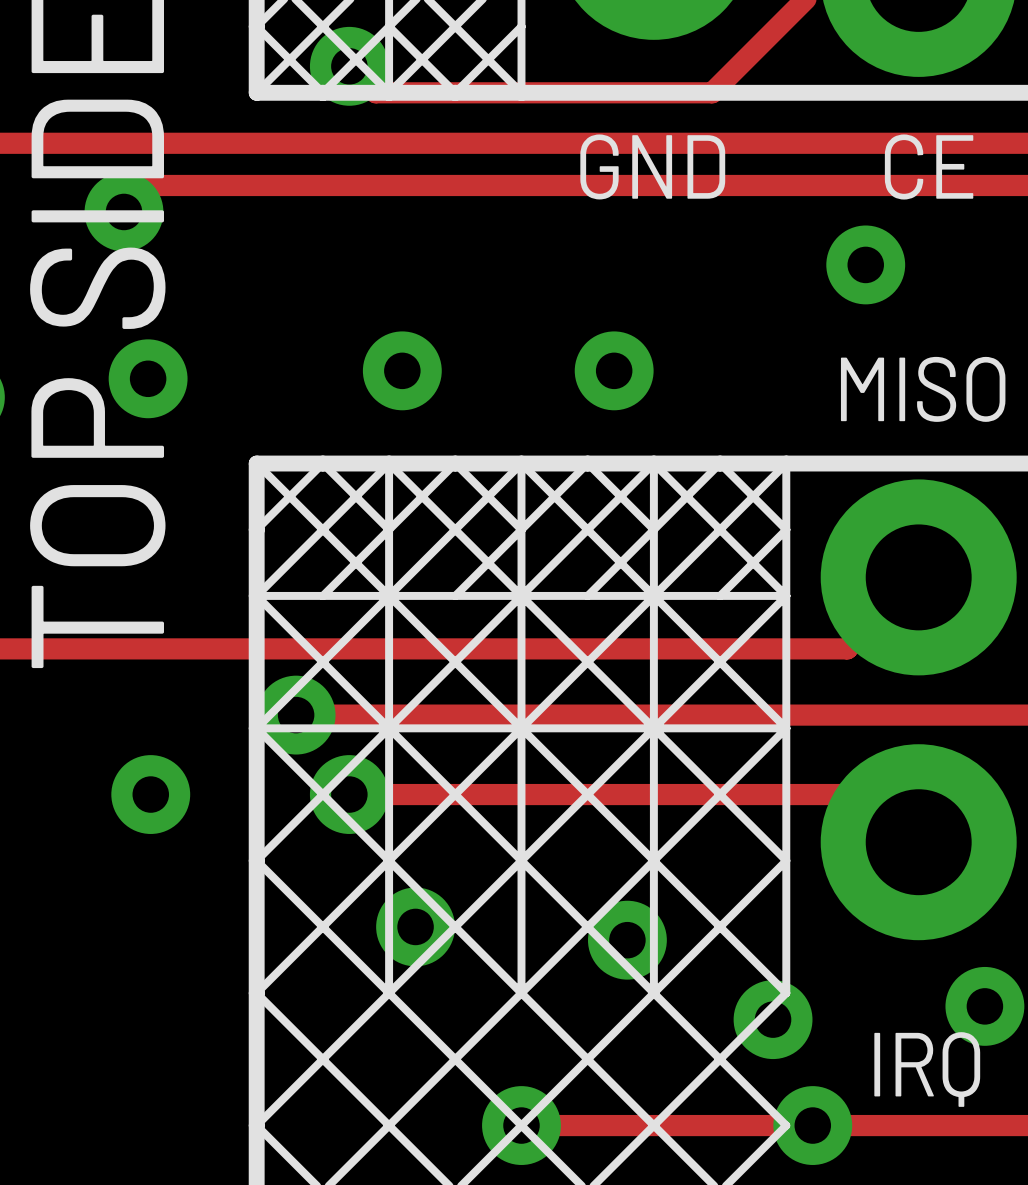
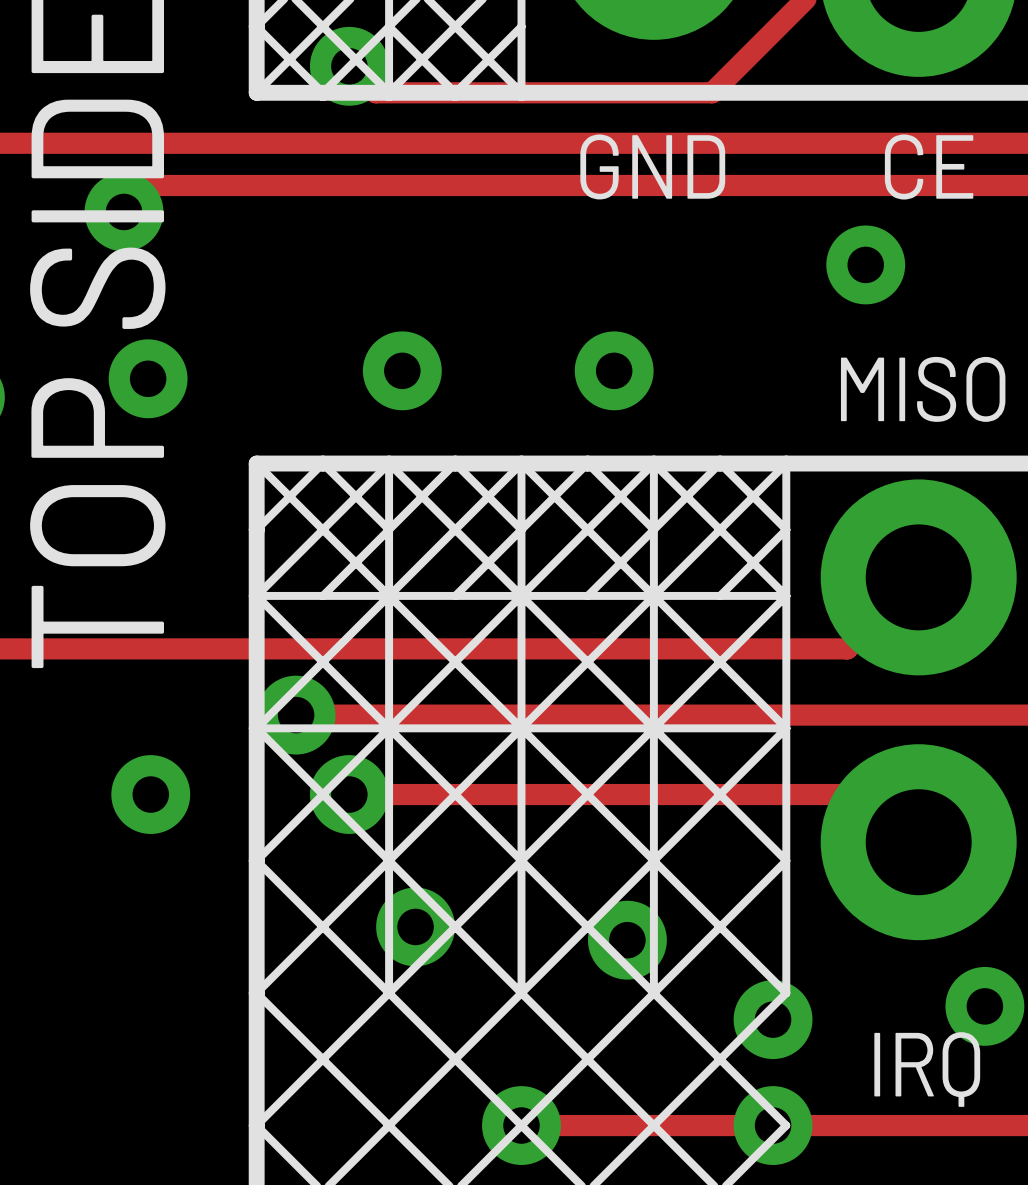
via position: (812, 1125) -> (773, 1125)

